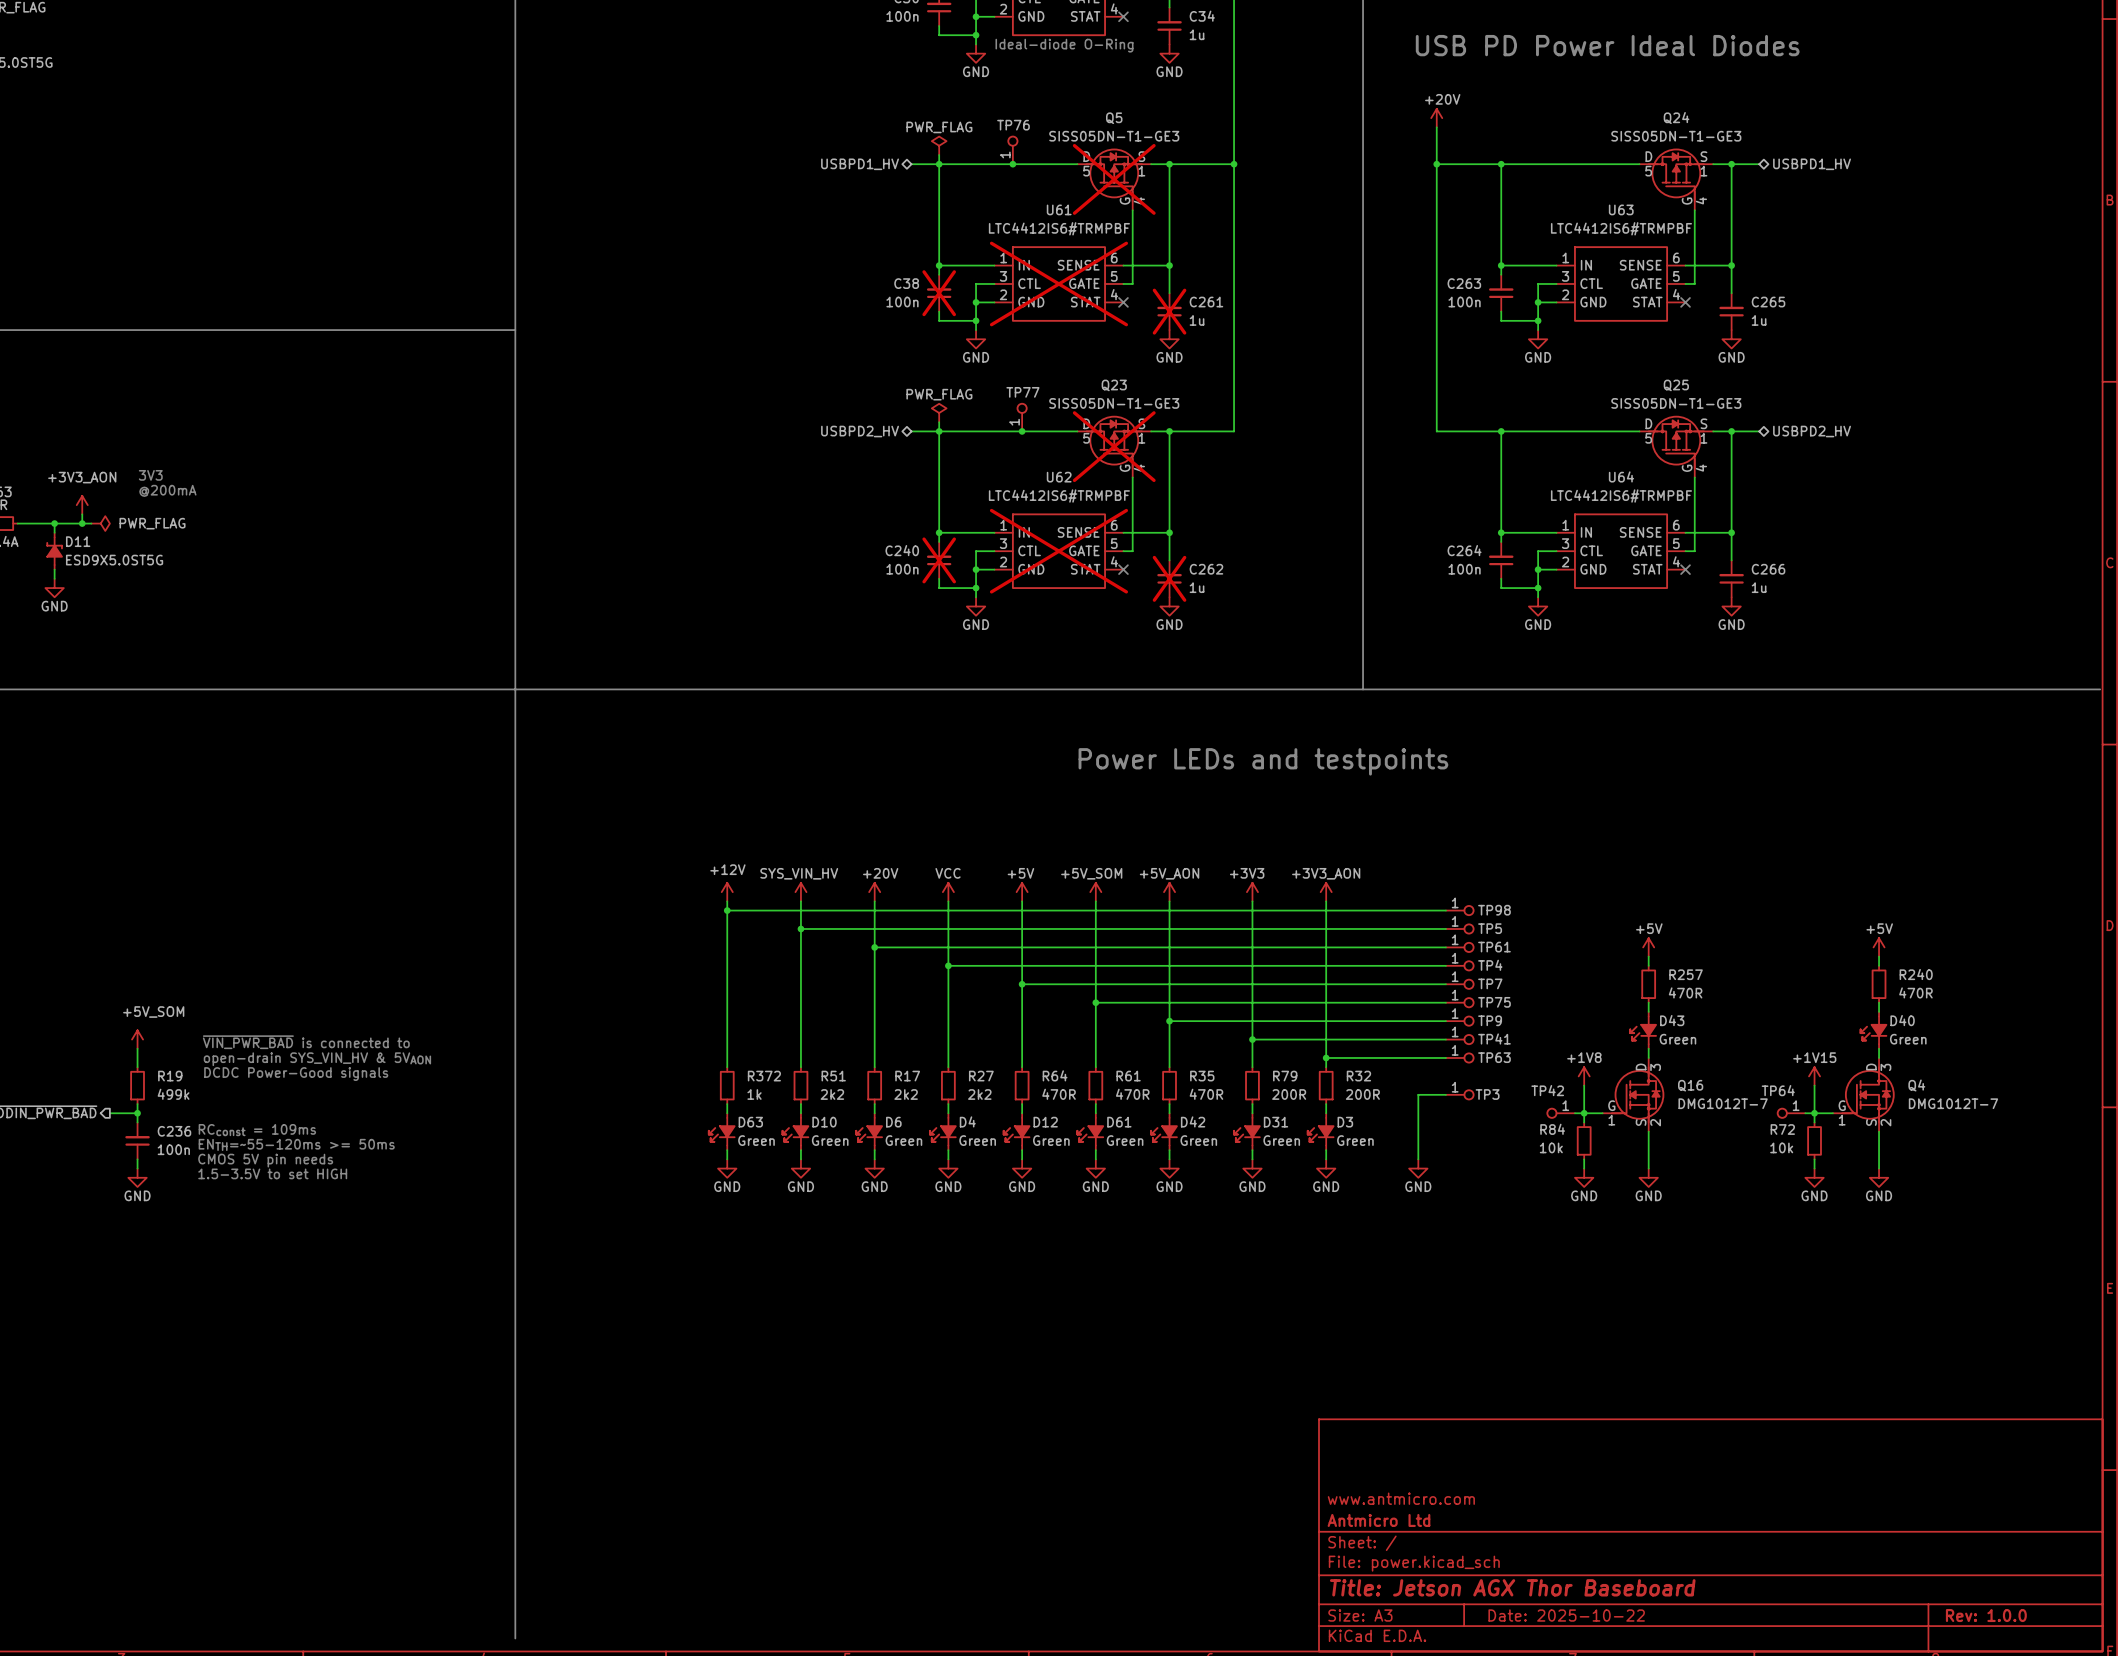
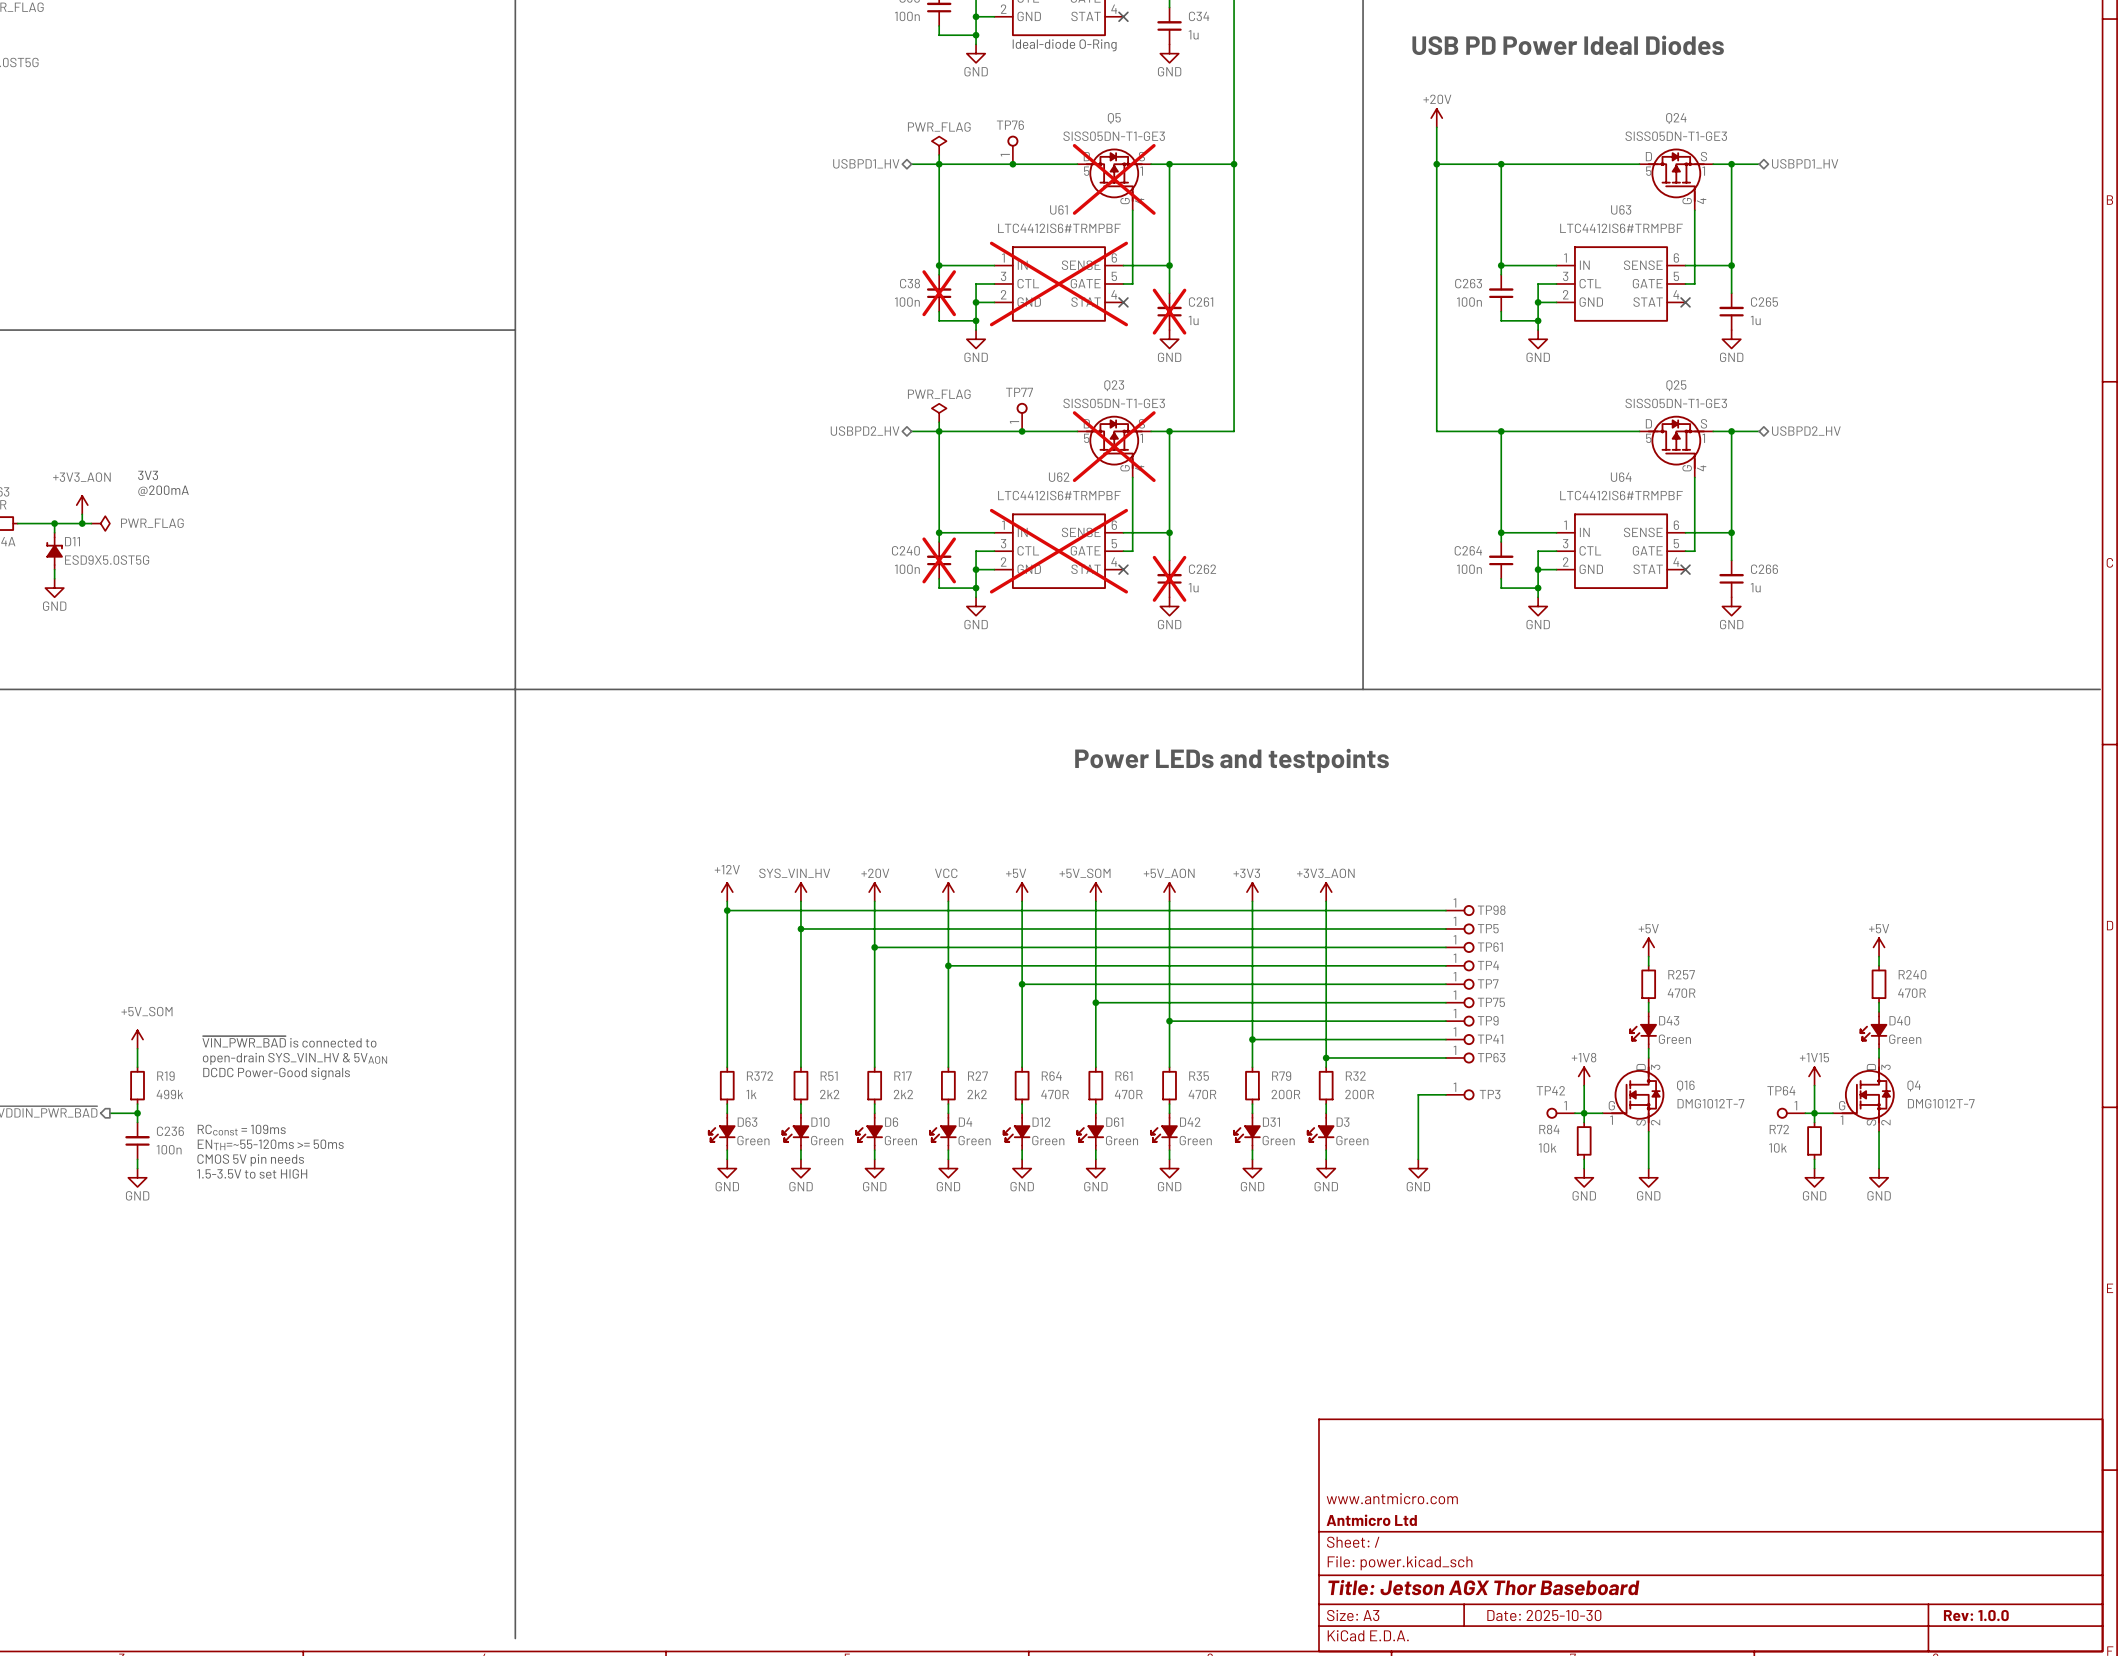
title block: Date: 2025-10-22 (1566, 1615) -> Date: 2025-10-30 (1544, 1615)

